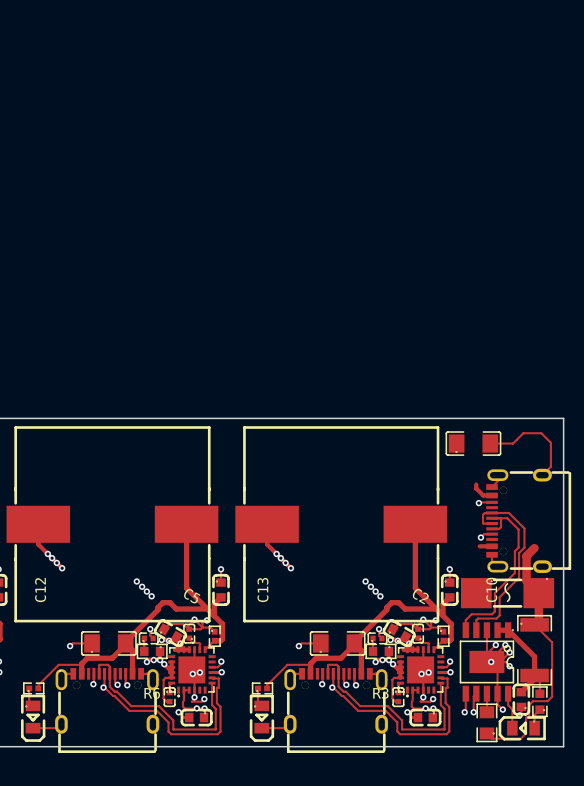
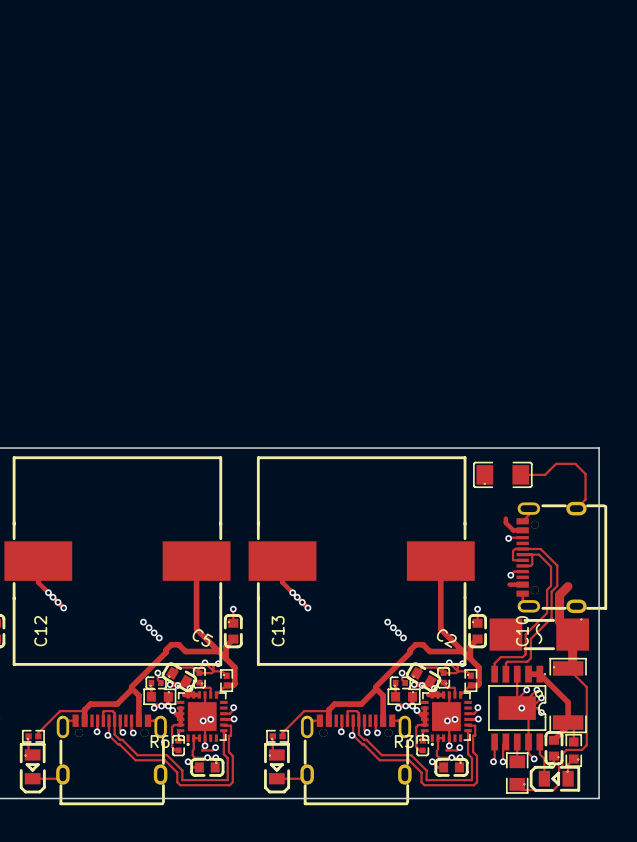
track: (92, 643) (72, 643) (70, 646) -> none
part: (108, 643) -> none
track: (320, 643) (301, 643) (298, 646) -> none
part: (337, 643) -> none
via: (70, 646) -> none
via: (298, 646) -> none

